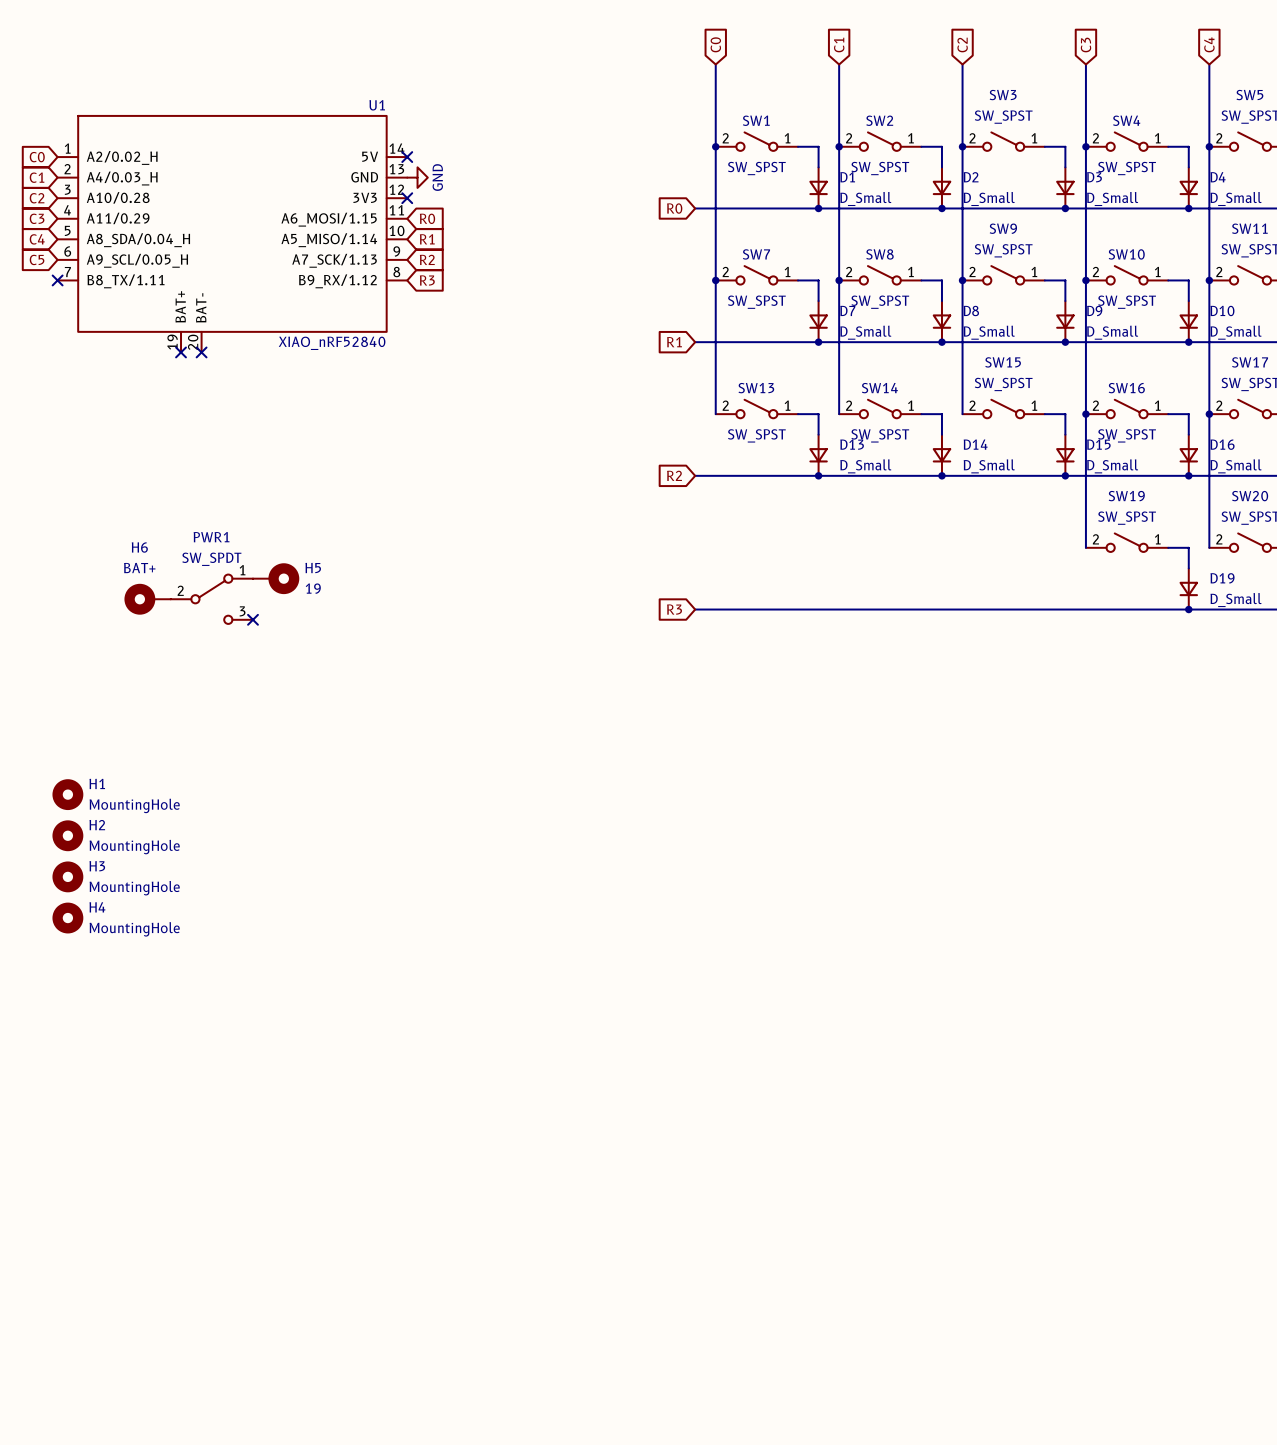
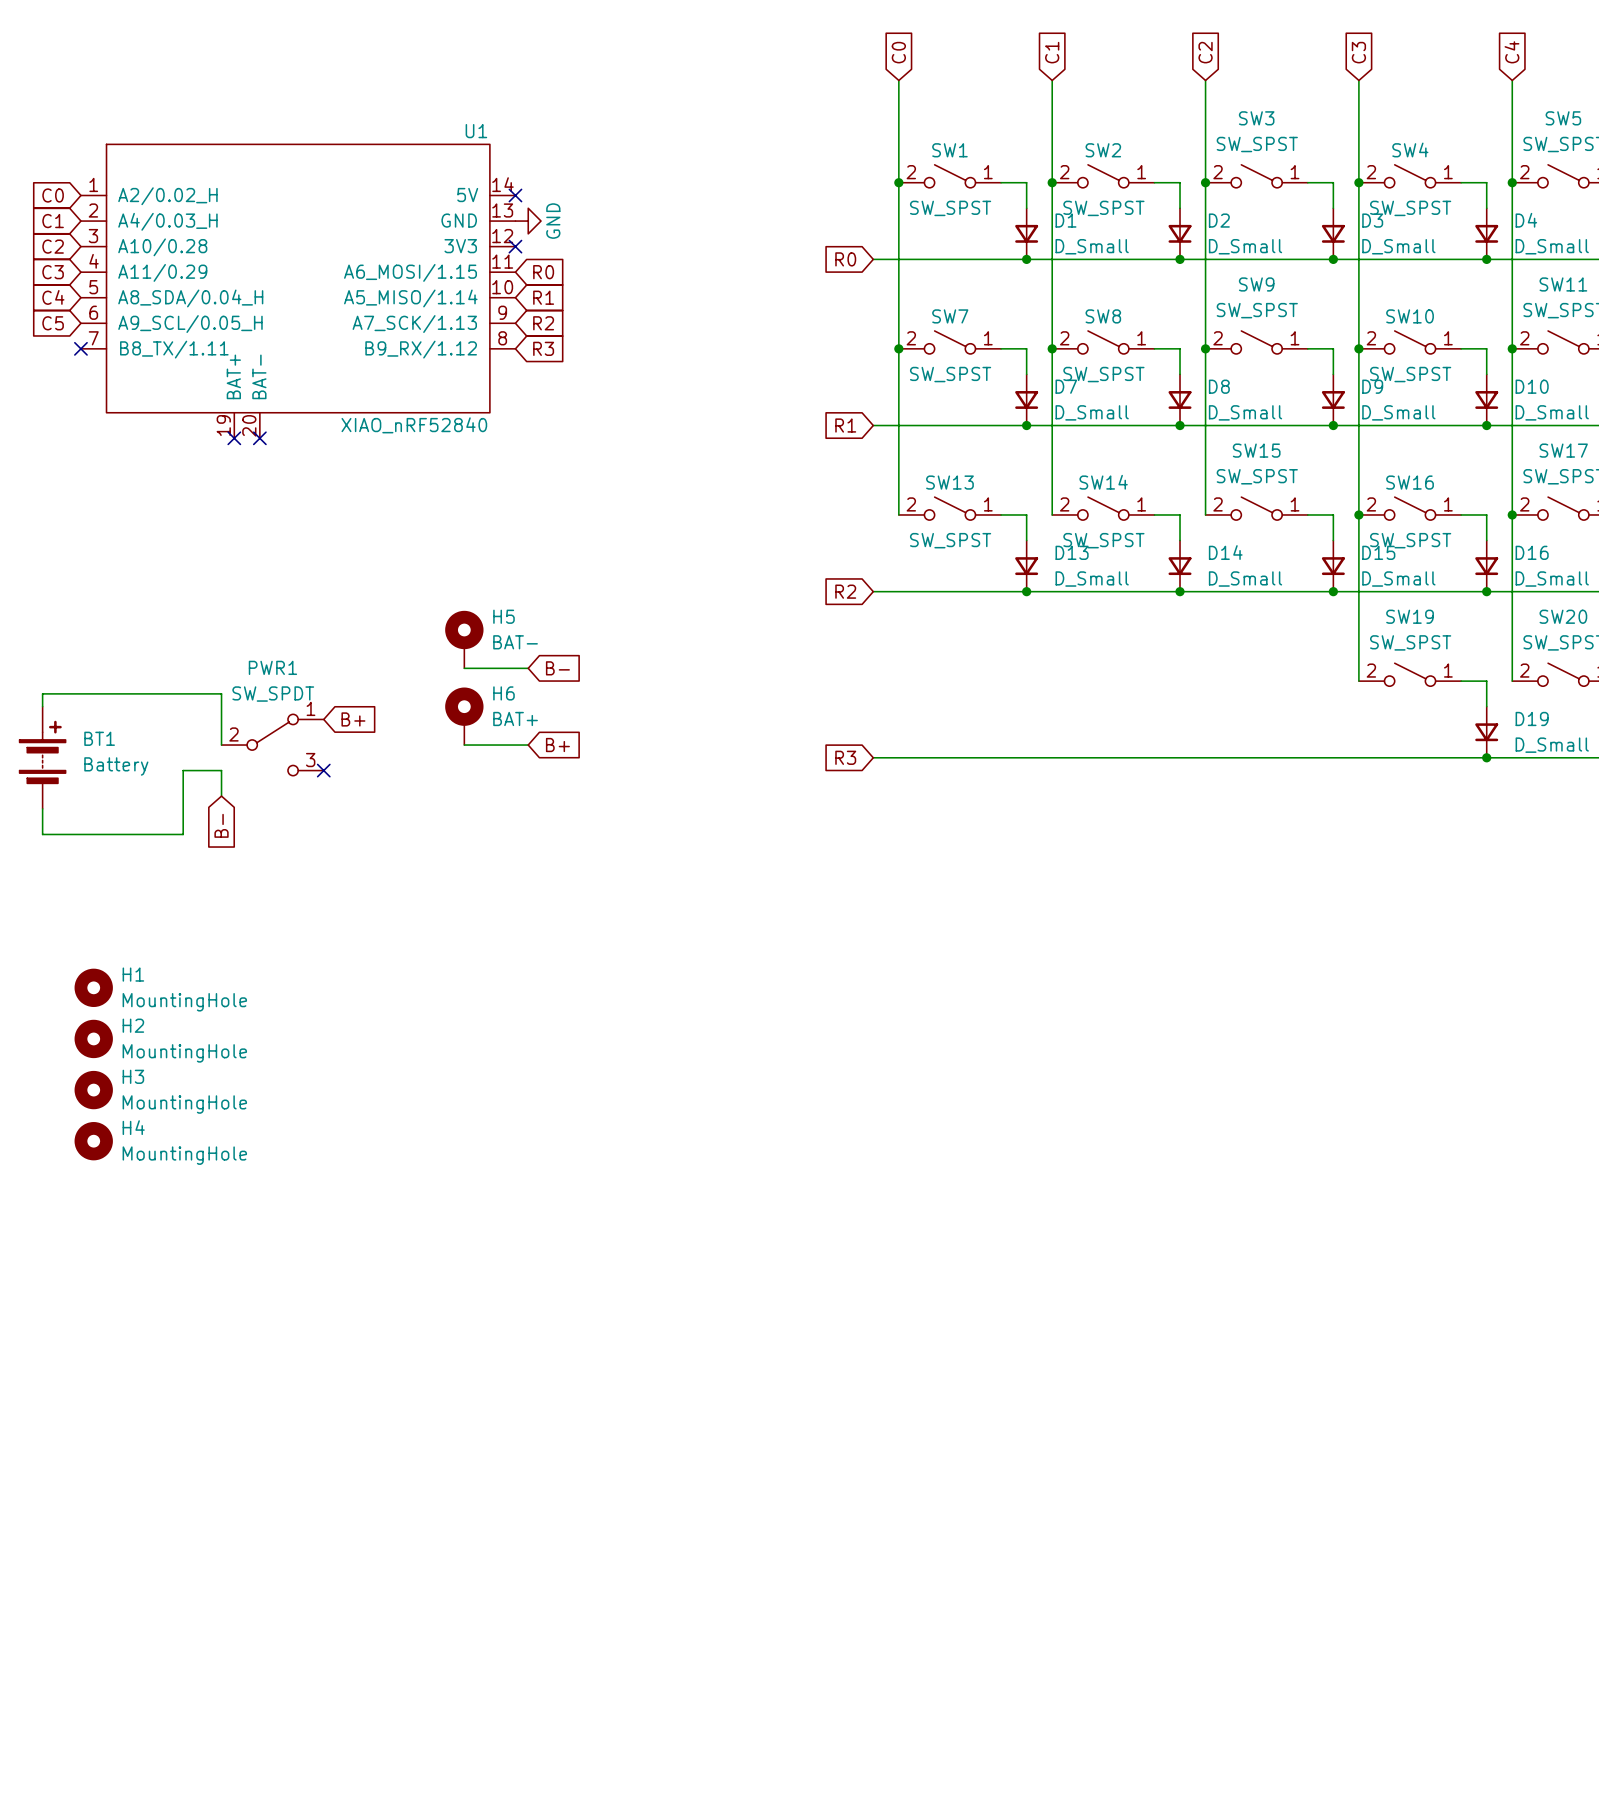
wire: none -> (464, 668) (528, 668)
global label: none -> B- (557, 668)
H6 name position: H6 (139, 547) -> H6 (503, 693)
wire: none -> (42, 706) (42, 693) (221, 693) (221, 745)
H6 value position: BAT+ (139, 568) -> BAT+ (515, 718)
global label: none -> B+ (353, 719)
H5 position: (276, 578) -> (464, 639)
H5 rotation: 0° (283, 578) -> 90° counterclockwise (464, 630)
H5 value: 19 (313, 588) -> BAT- (515, 642)
H6 rotation: 0° (139, 599) -> 90° clockwise (464, 706)
H6 position: (147, 599) -> (464, 716)
wire: none -> (464, 745) (528, 745)
global label: none -> B+ (557, 745)
BT1: none -> Battery (42, 757)
wire: none -> (221, 796) (221, 770) (183, 770) (183, 834) (42, 834) (42, 808)
global label: none -> B- (221, 825)

